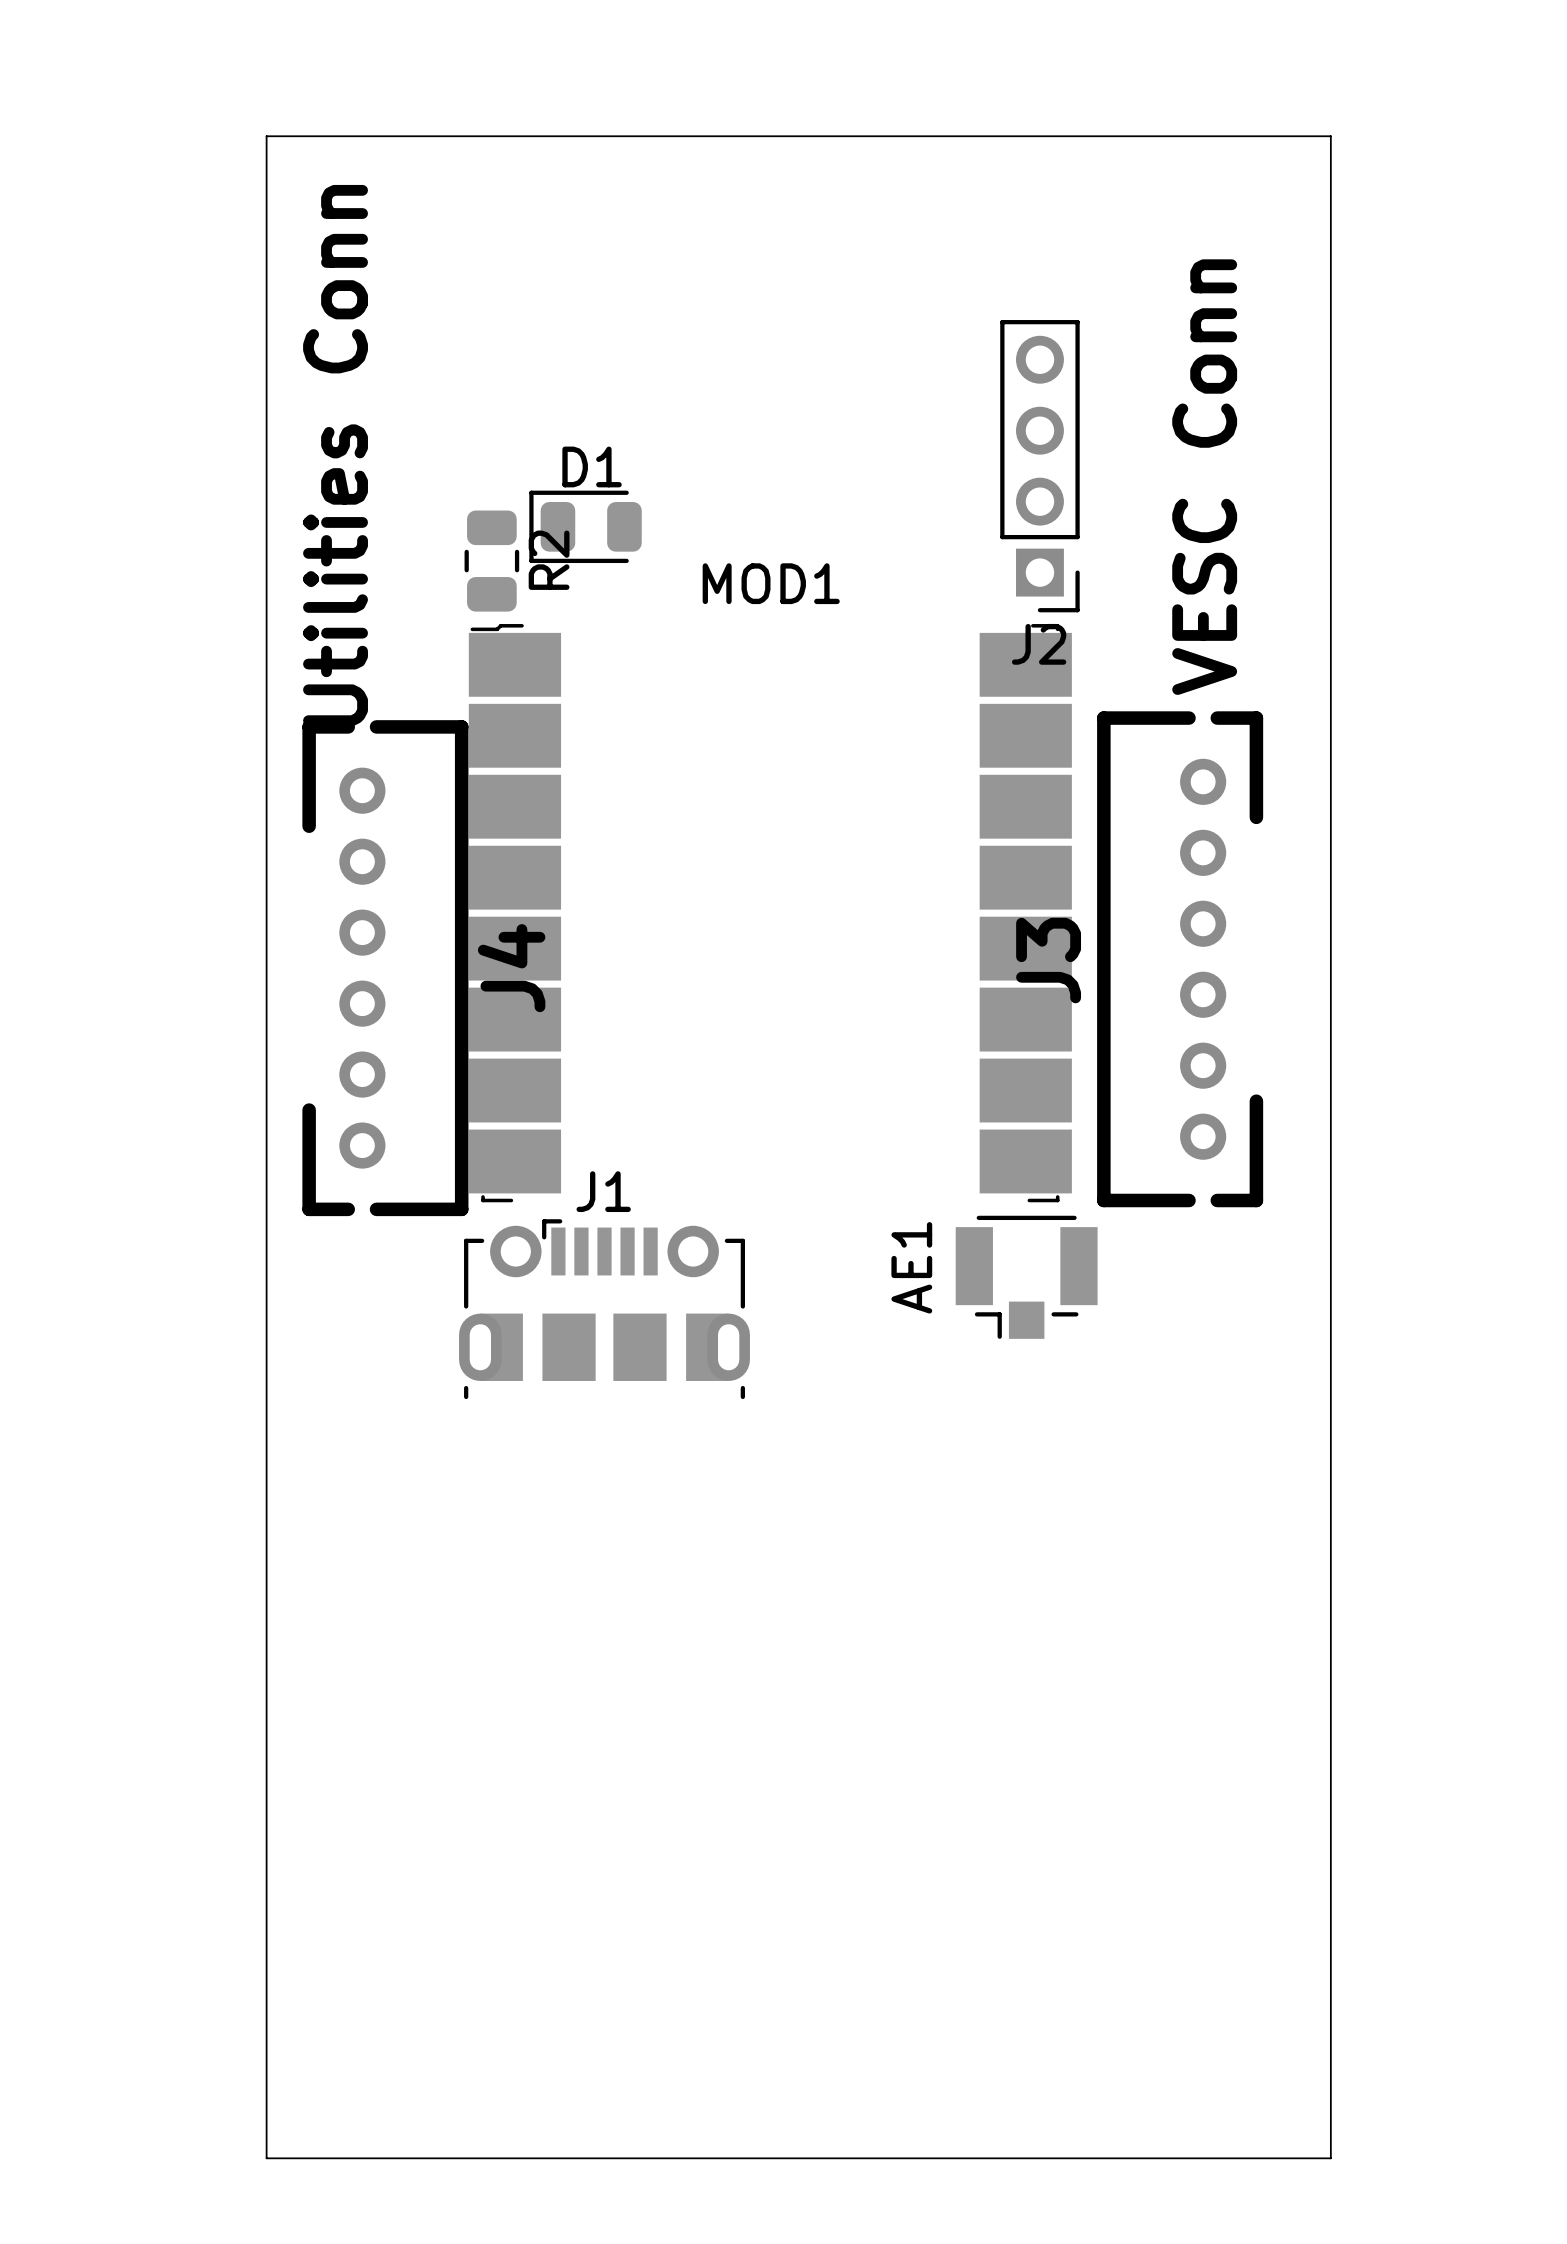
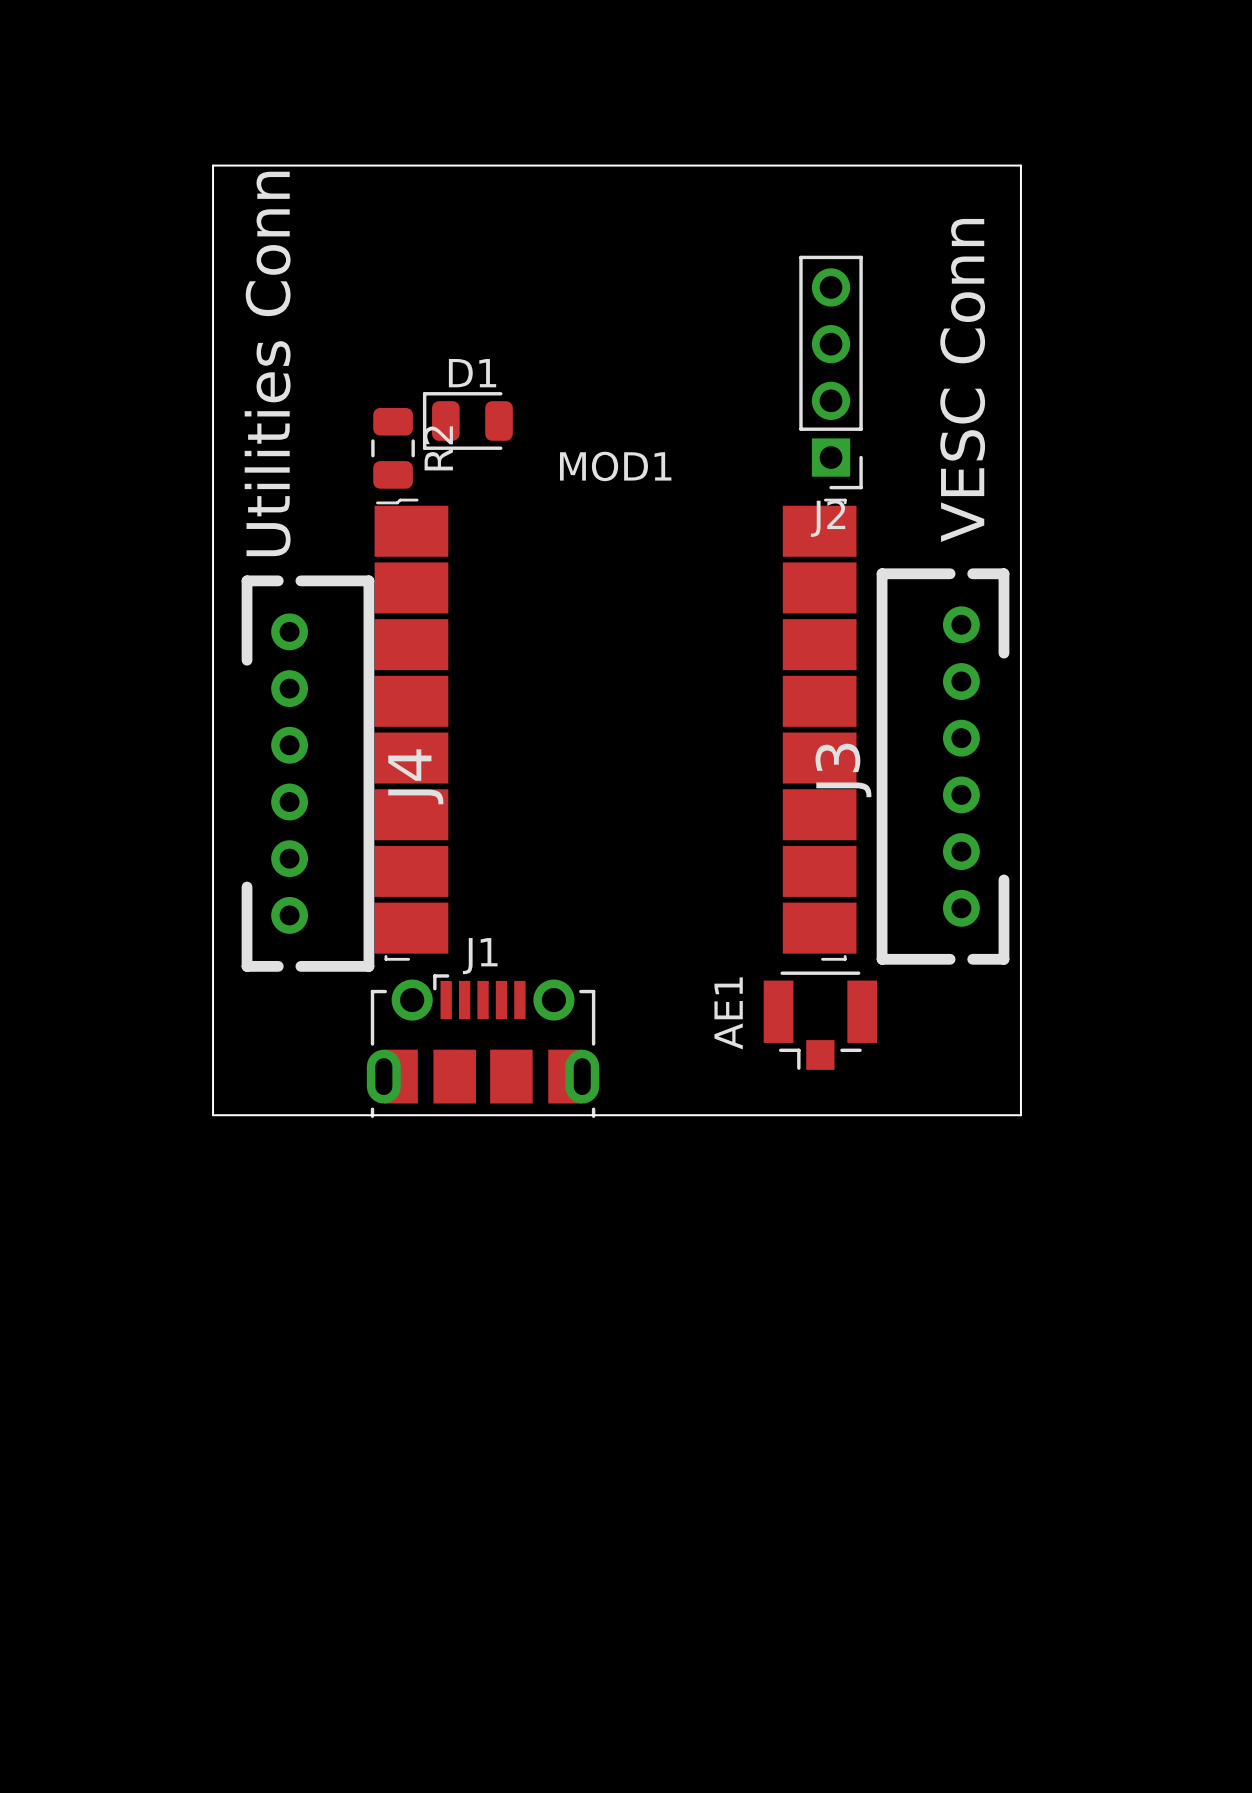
board edge: (266, 207) (266, 136) (1330, 136) (1330, 2158) (266, 2158) (266, 1395) -> (213, 165) (1020, 165) (1020, 1115) (213, 1115)

